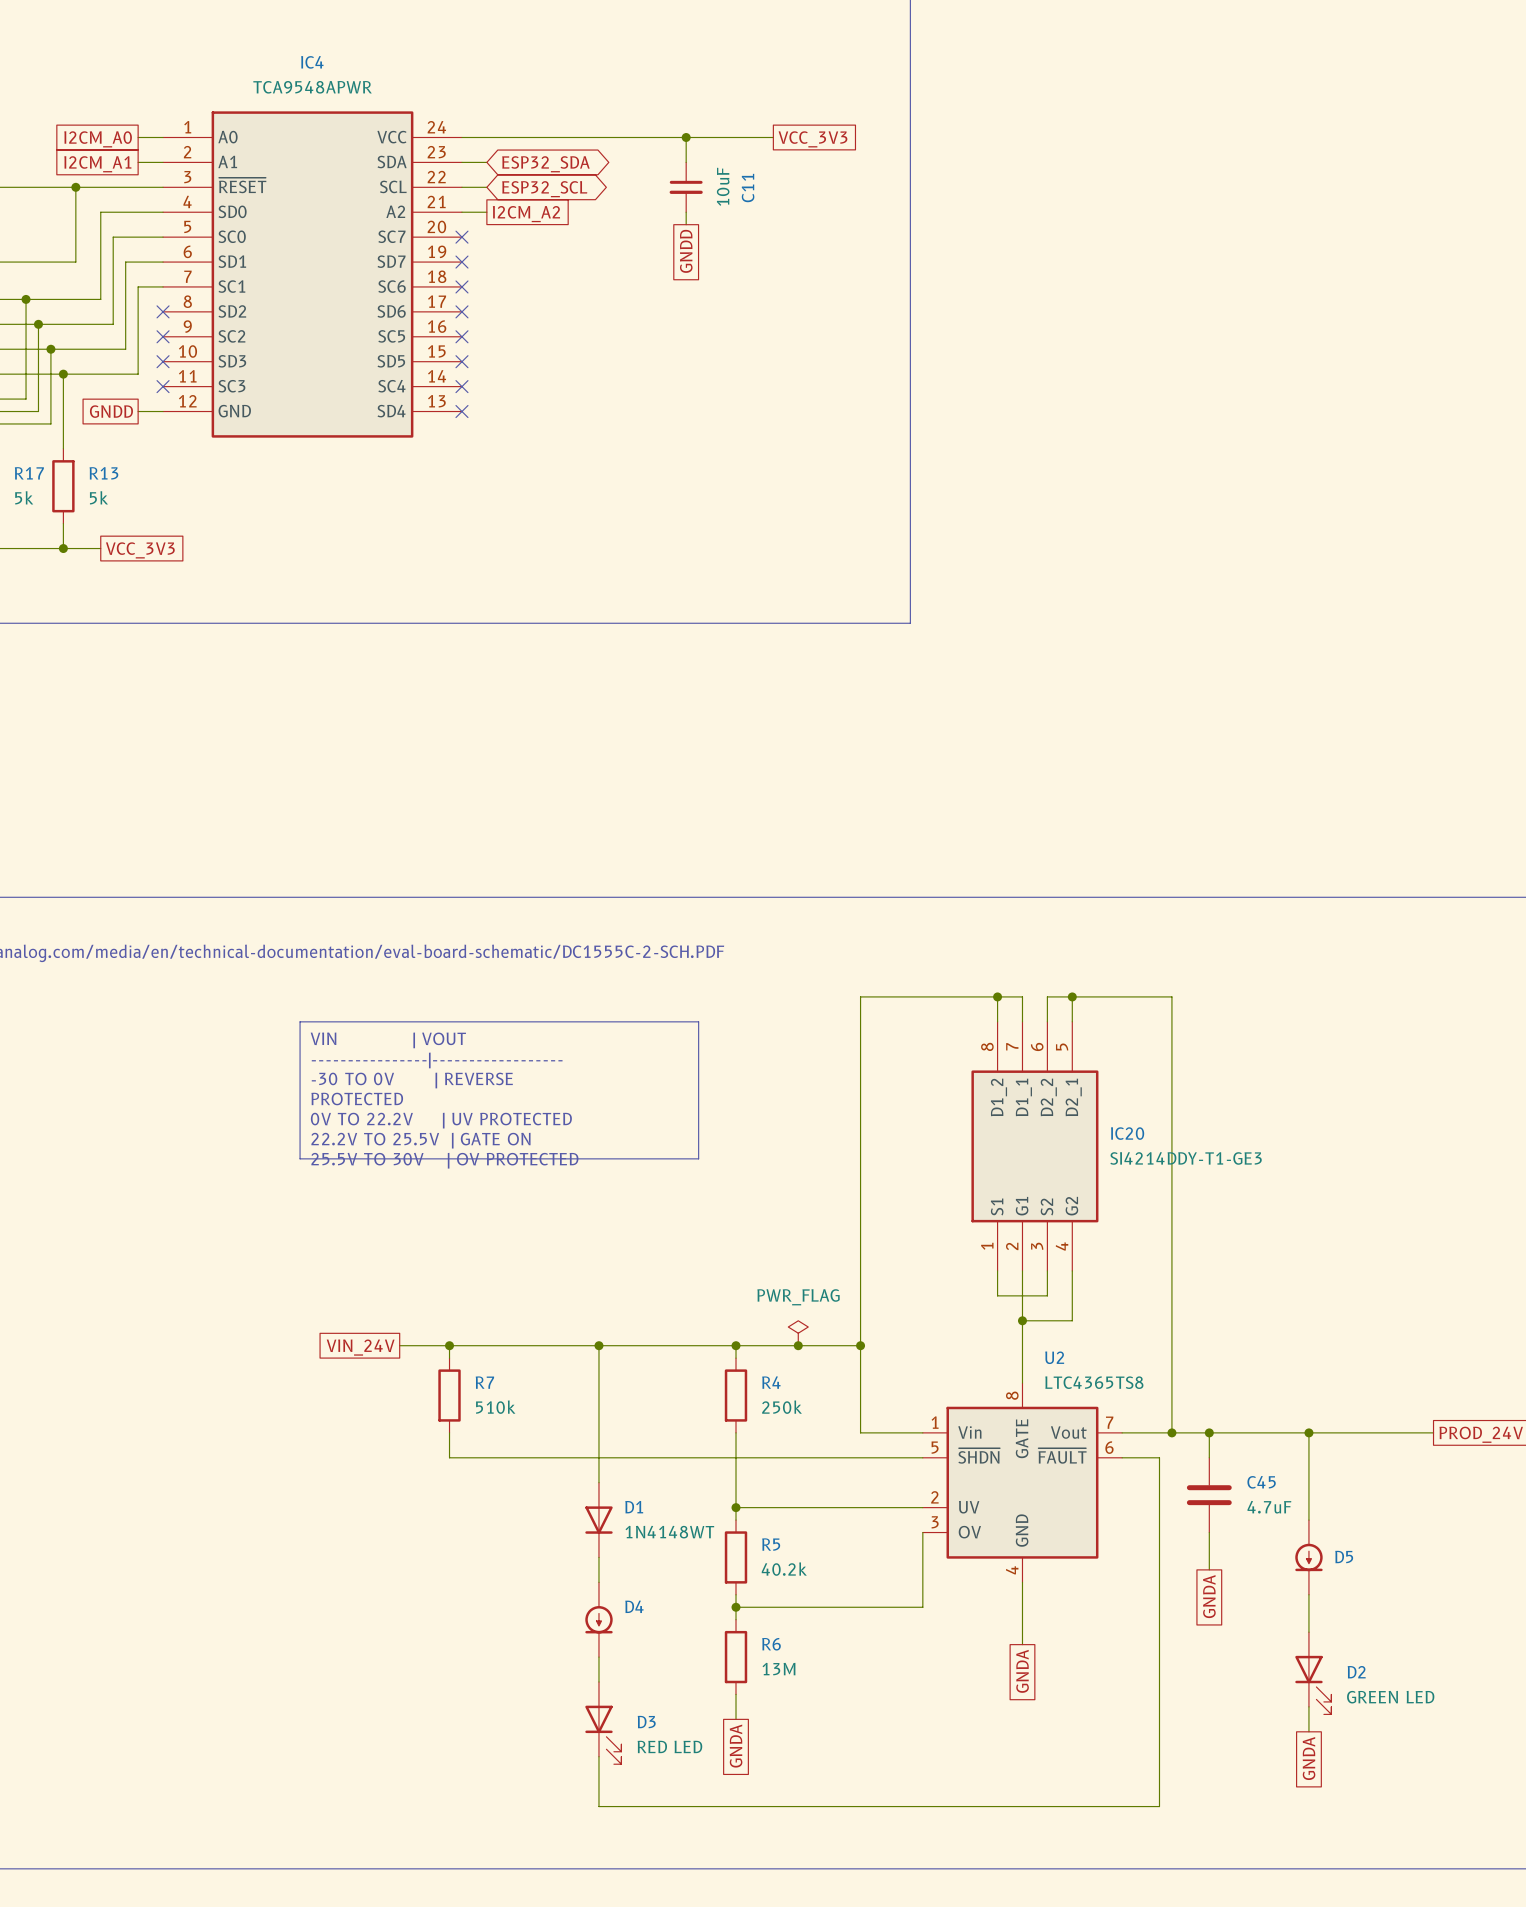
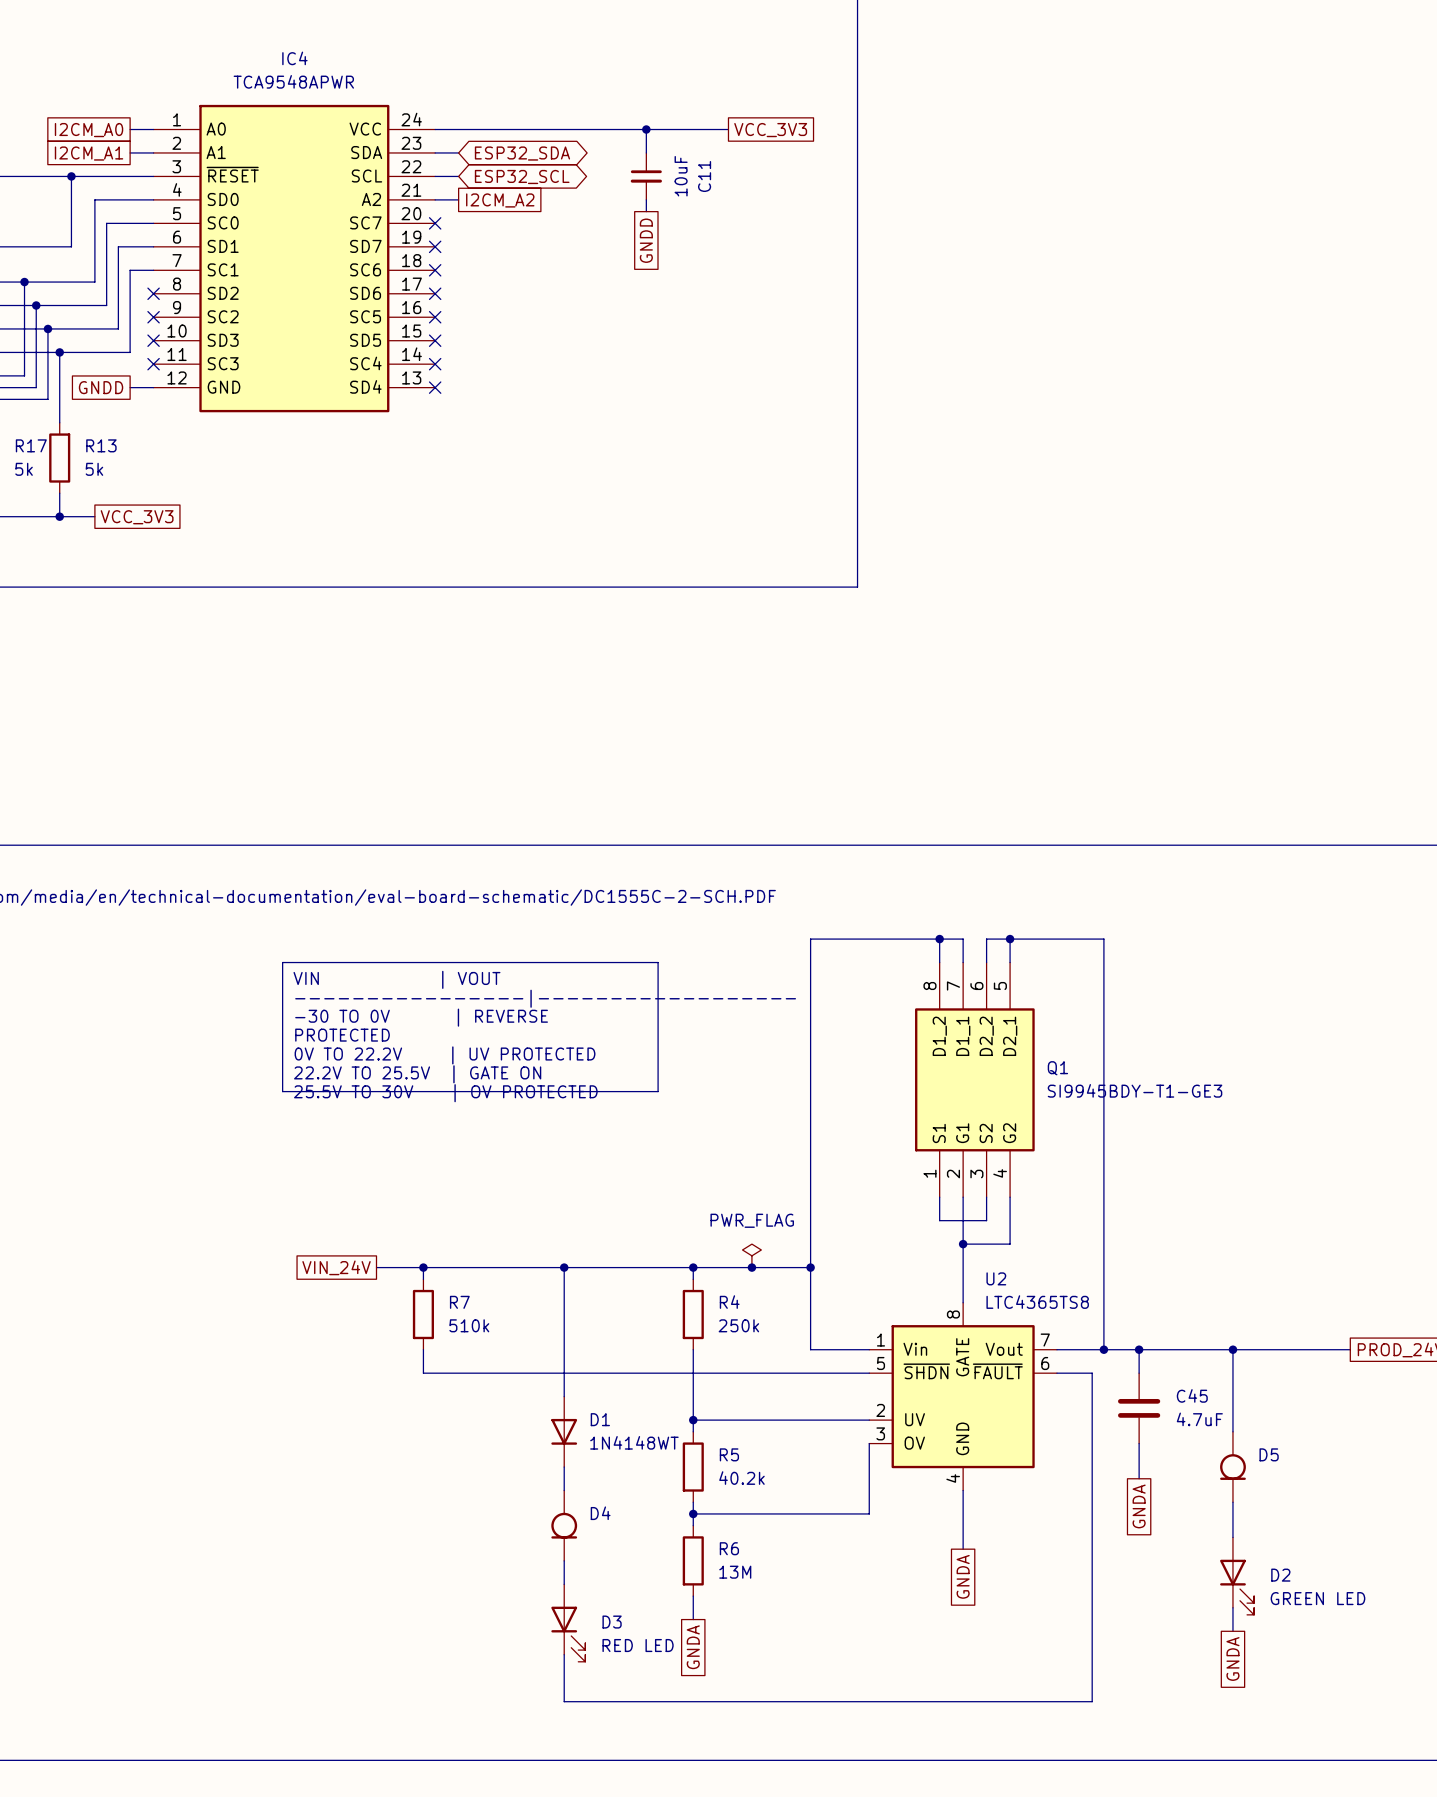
IC20 name: IC20 (1127, 1133) -> Q1 (1057, 1068)
IC20 value: SI4214DDY-T1-GE3 (1186, 1158) -> SI9945BDY-T1-GE3 (1135, 1090)
D5 symbol: [1295, 1520, 1323, 1595] -> [1220, 1431, 1246, 1503]
D4 symbol: [585, 1582, 613, 1658] -> [551, 1490, 578, 1561]

